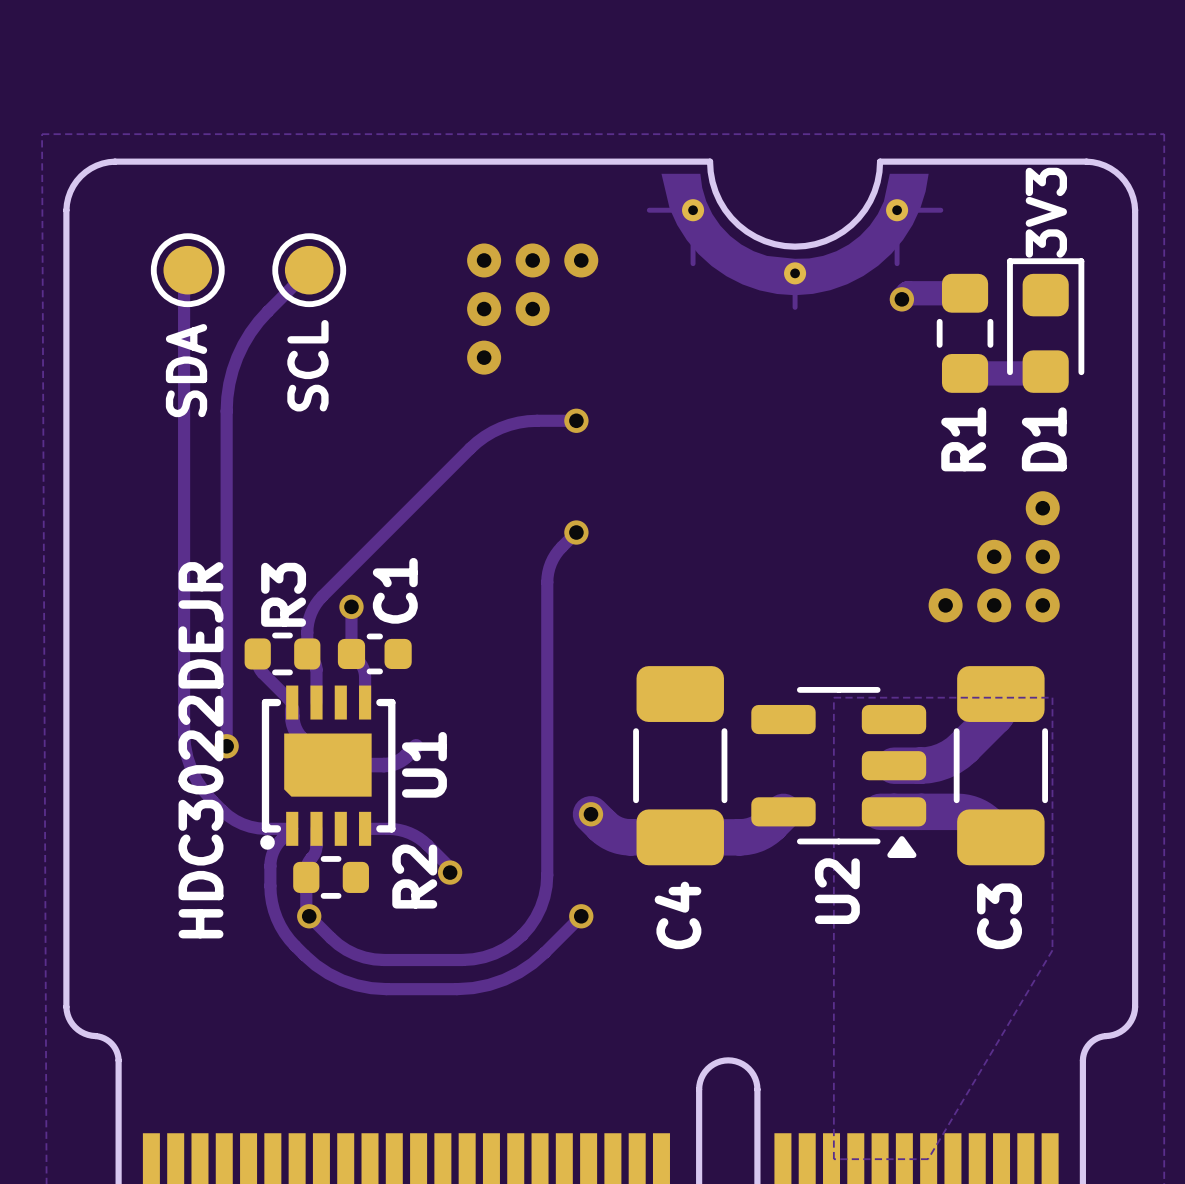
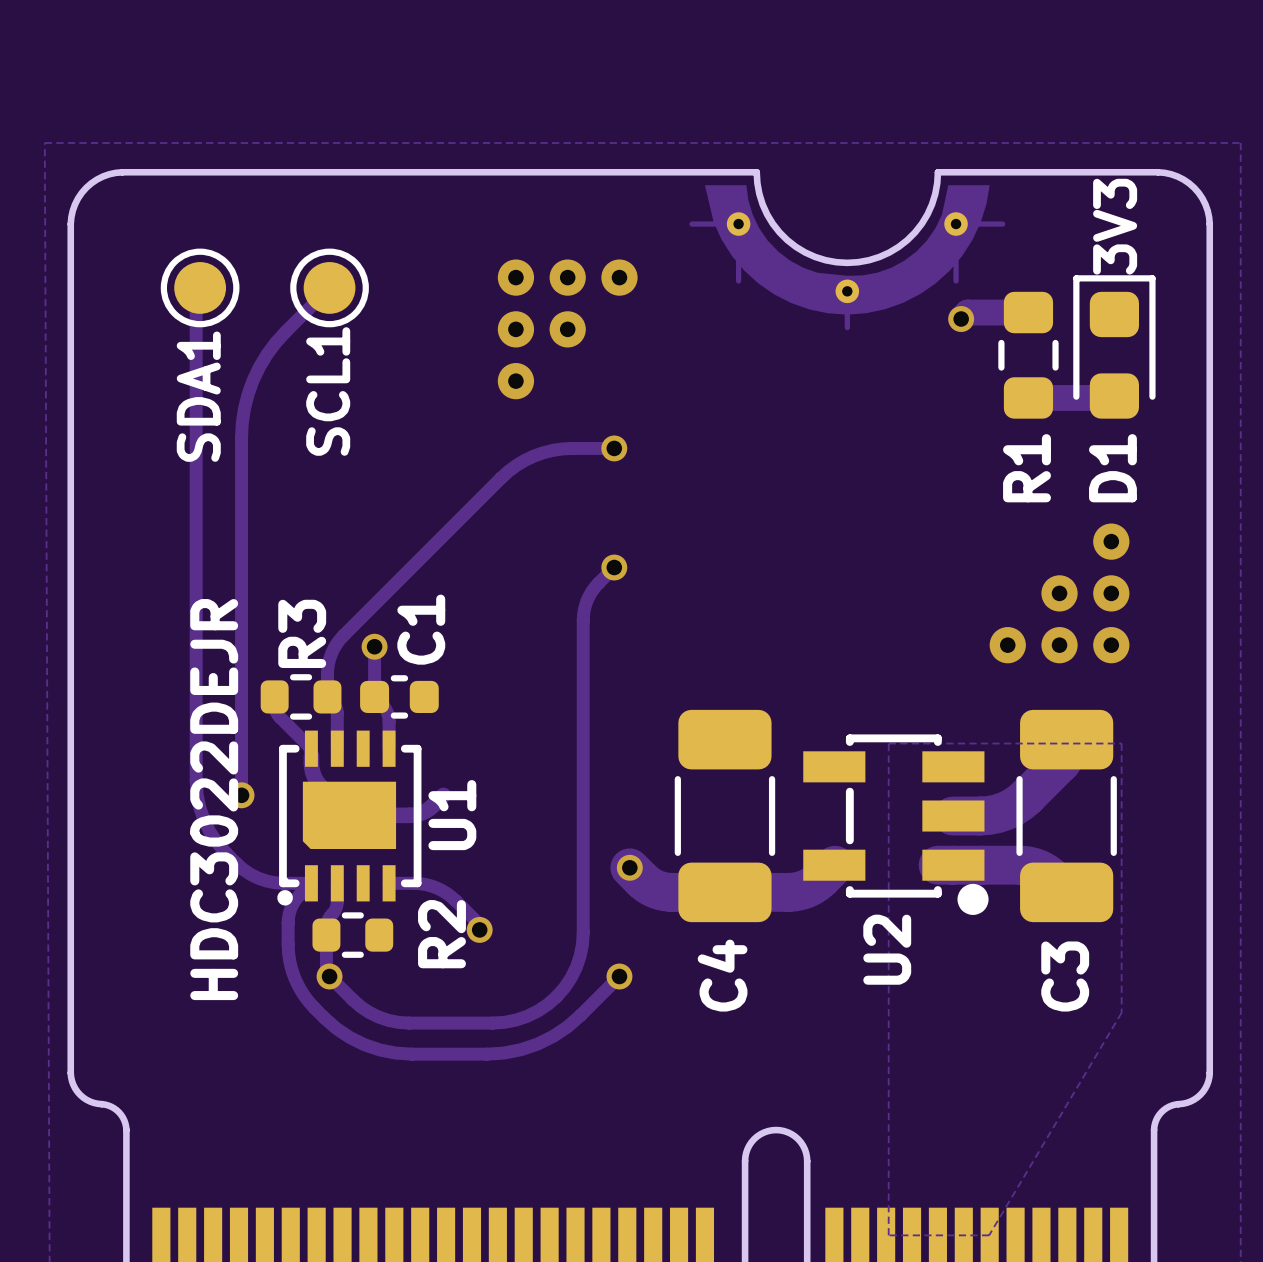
SCL name: SCL (307, 365) -> SCL1 (328, 391)
SDA name: SDA (186, 370) -> SDA1 (198, 396)
U2 footprint: [751, 686, 927, 858] -> [803, 734, 989, 915]

